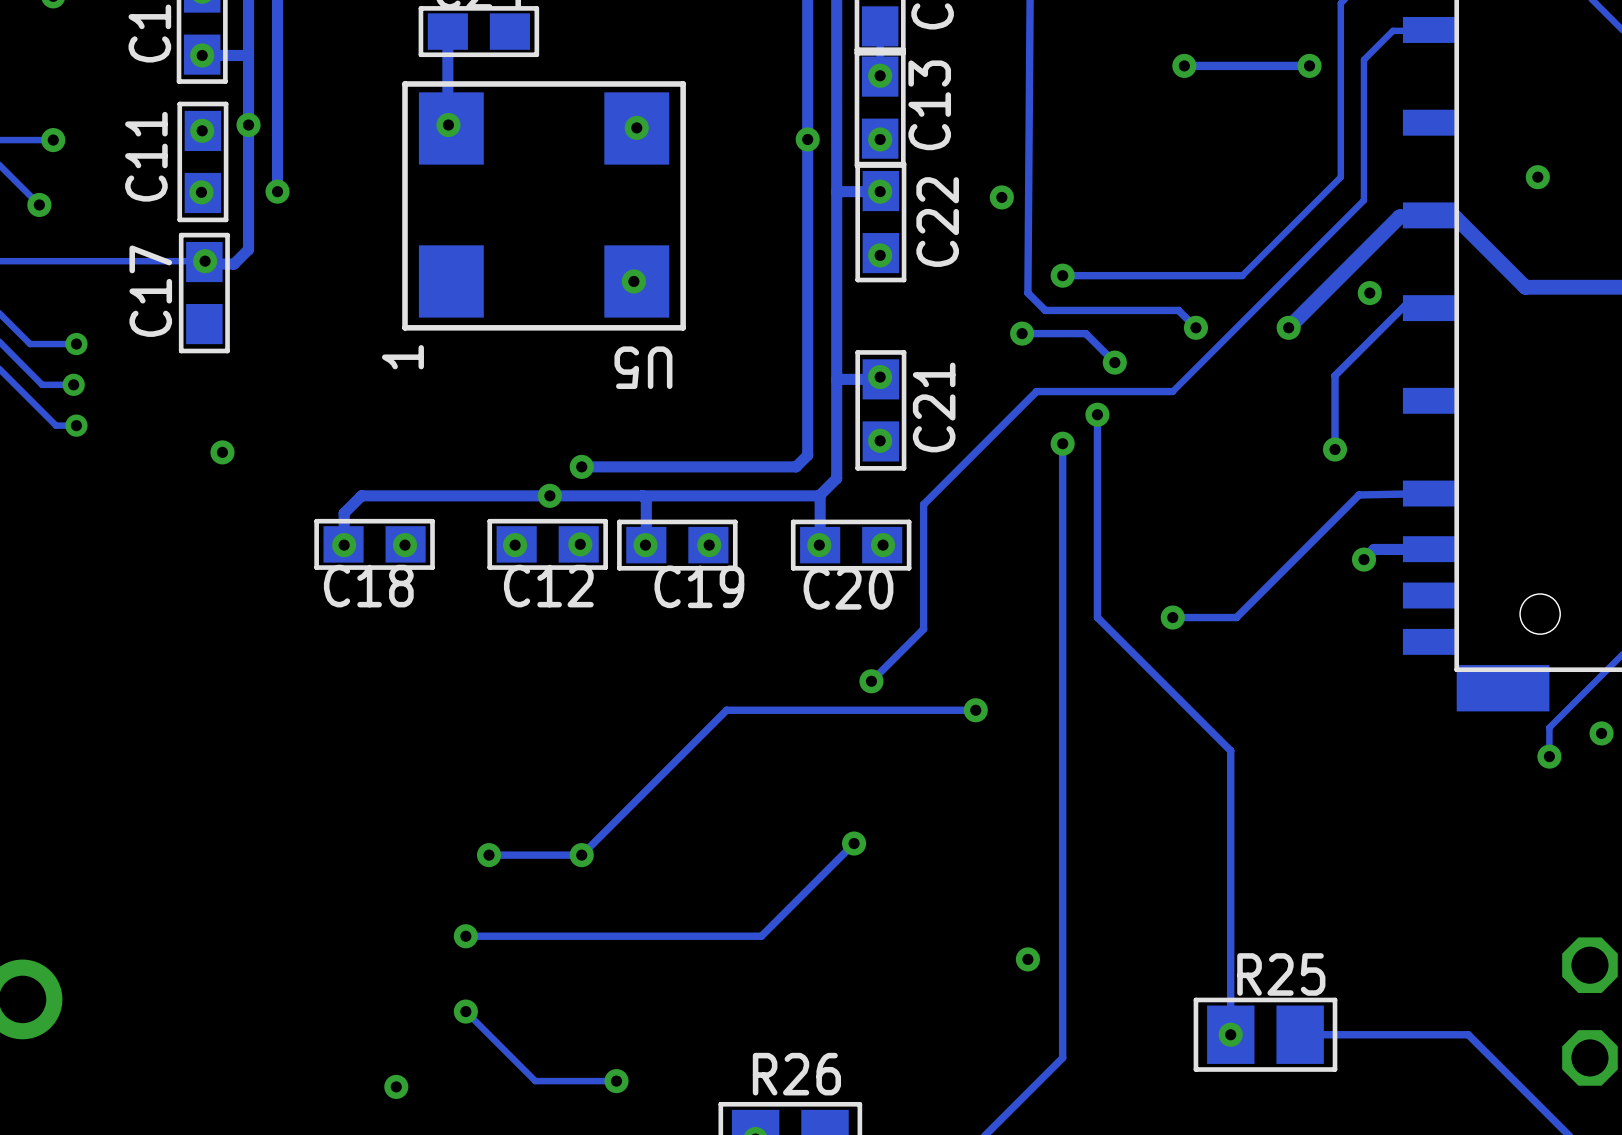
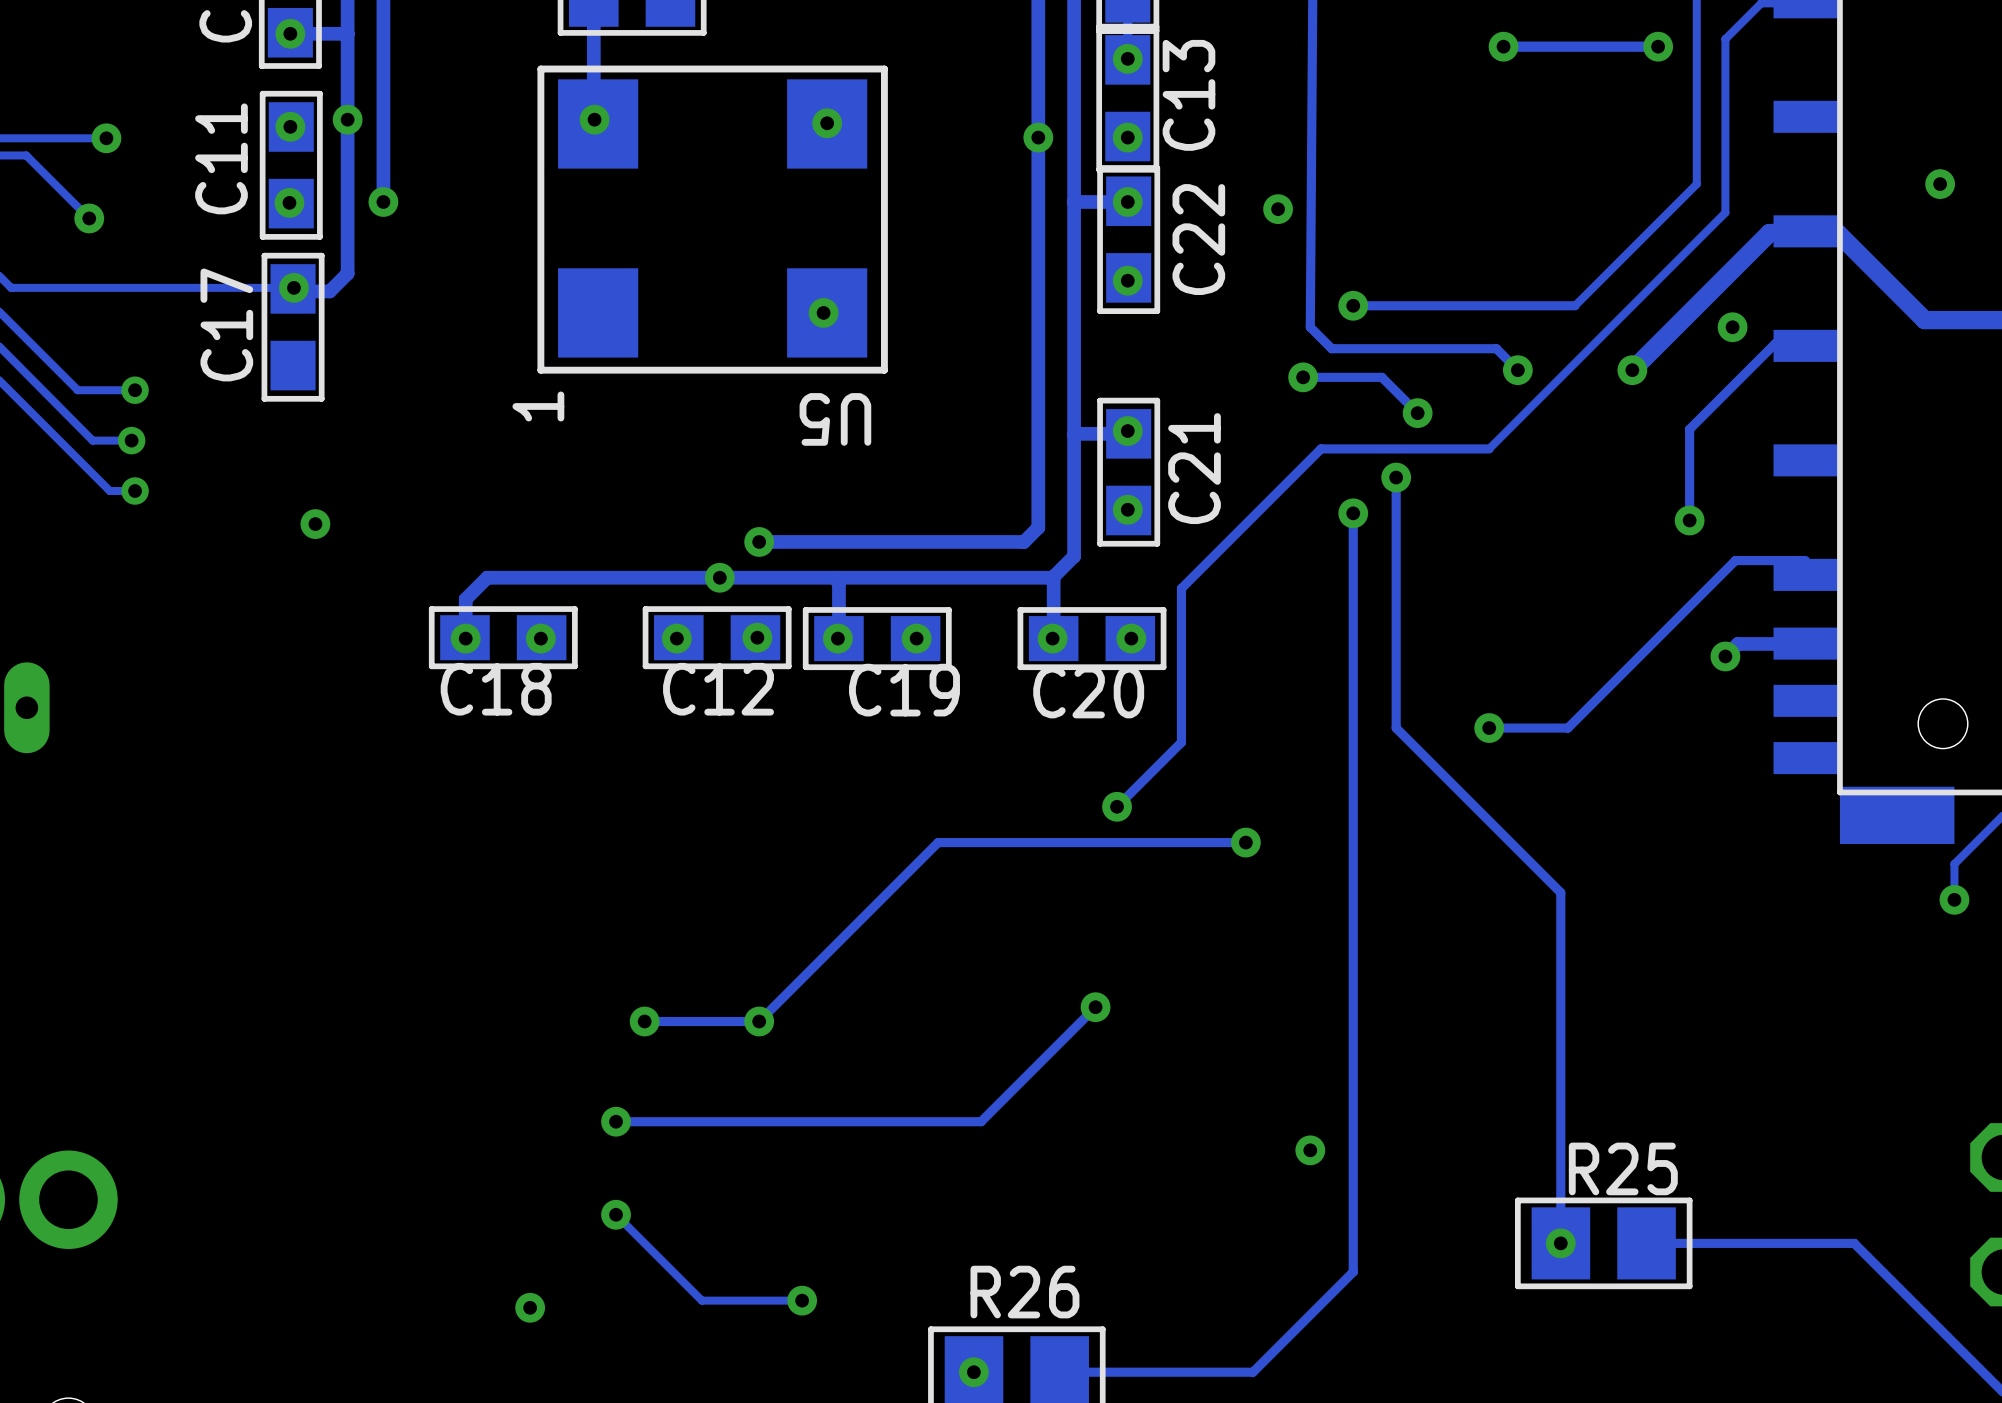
track: (1428, 493) (1359, 494) -> (1805, 560) (1735, 560) (1719, 576)

